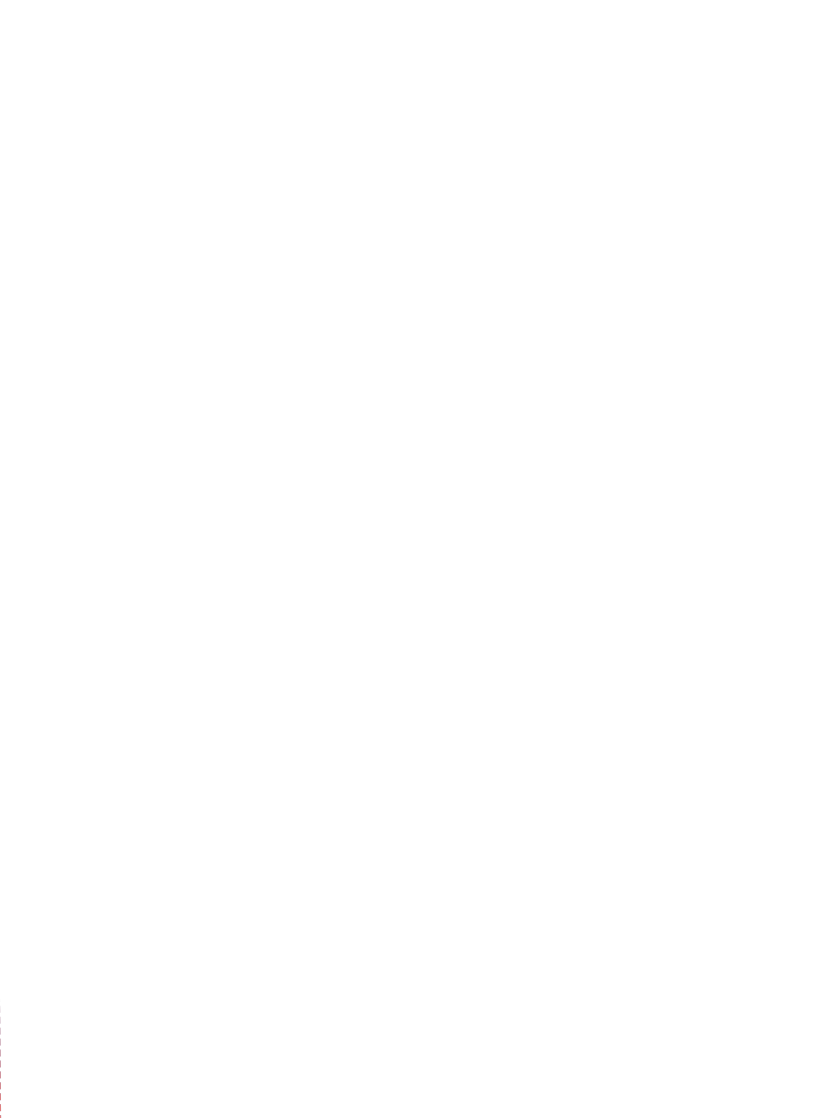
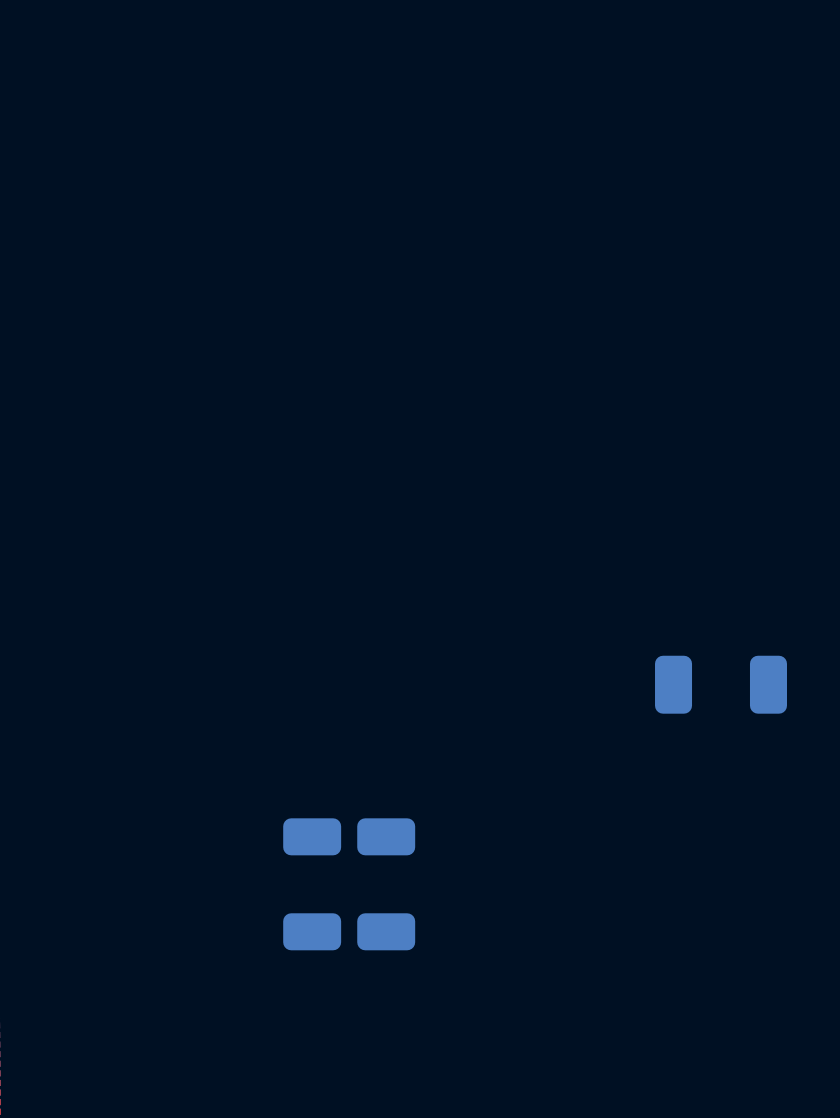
part: none -> (721, 684)
part: none -> (312, 884)
part: none -> (386, 884)

